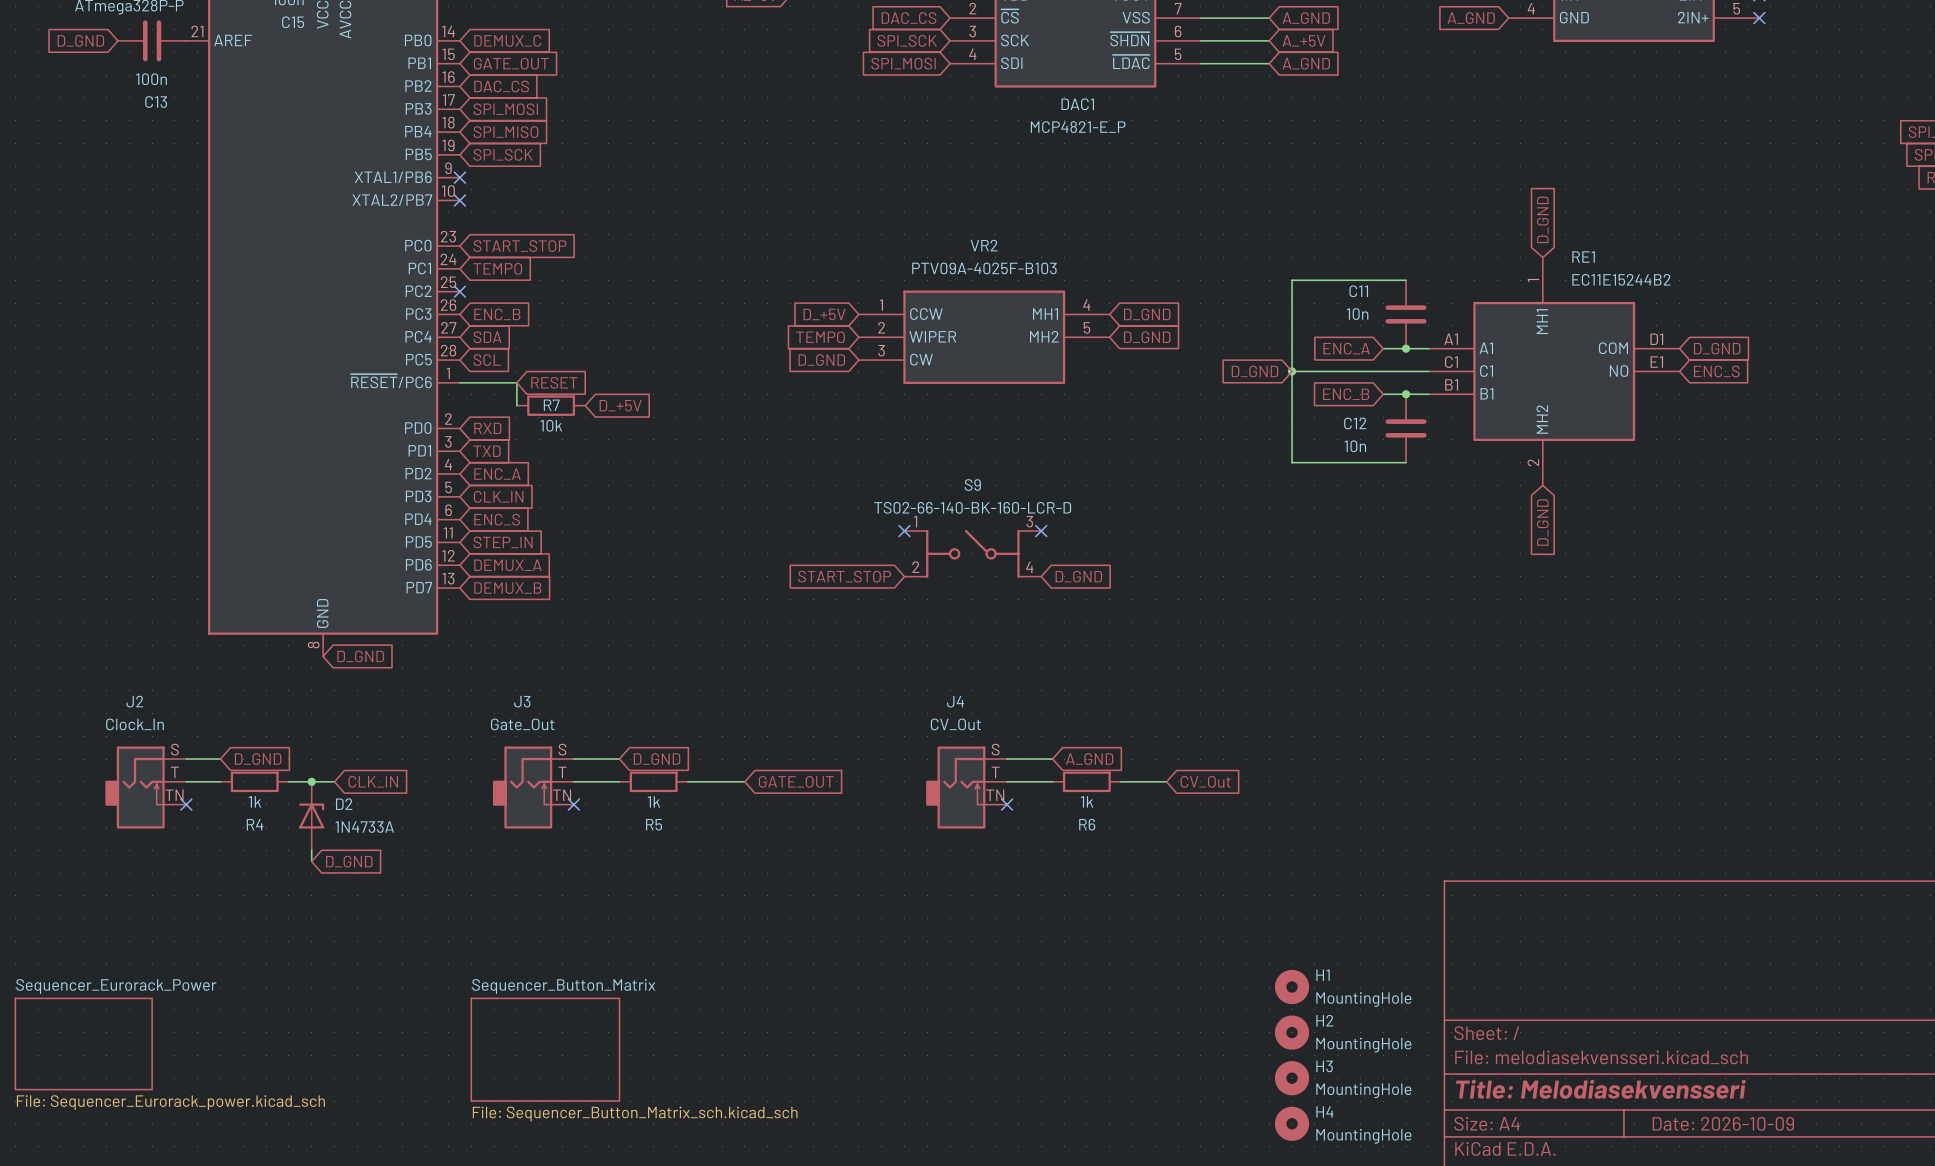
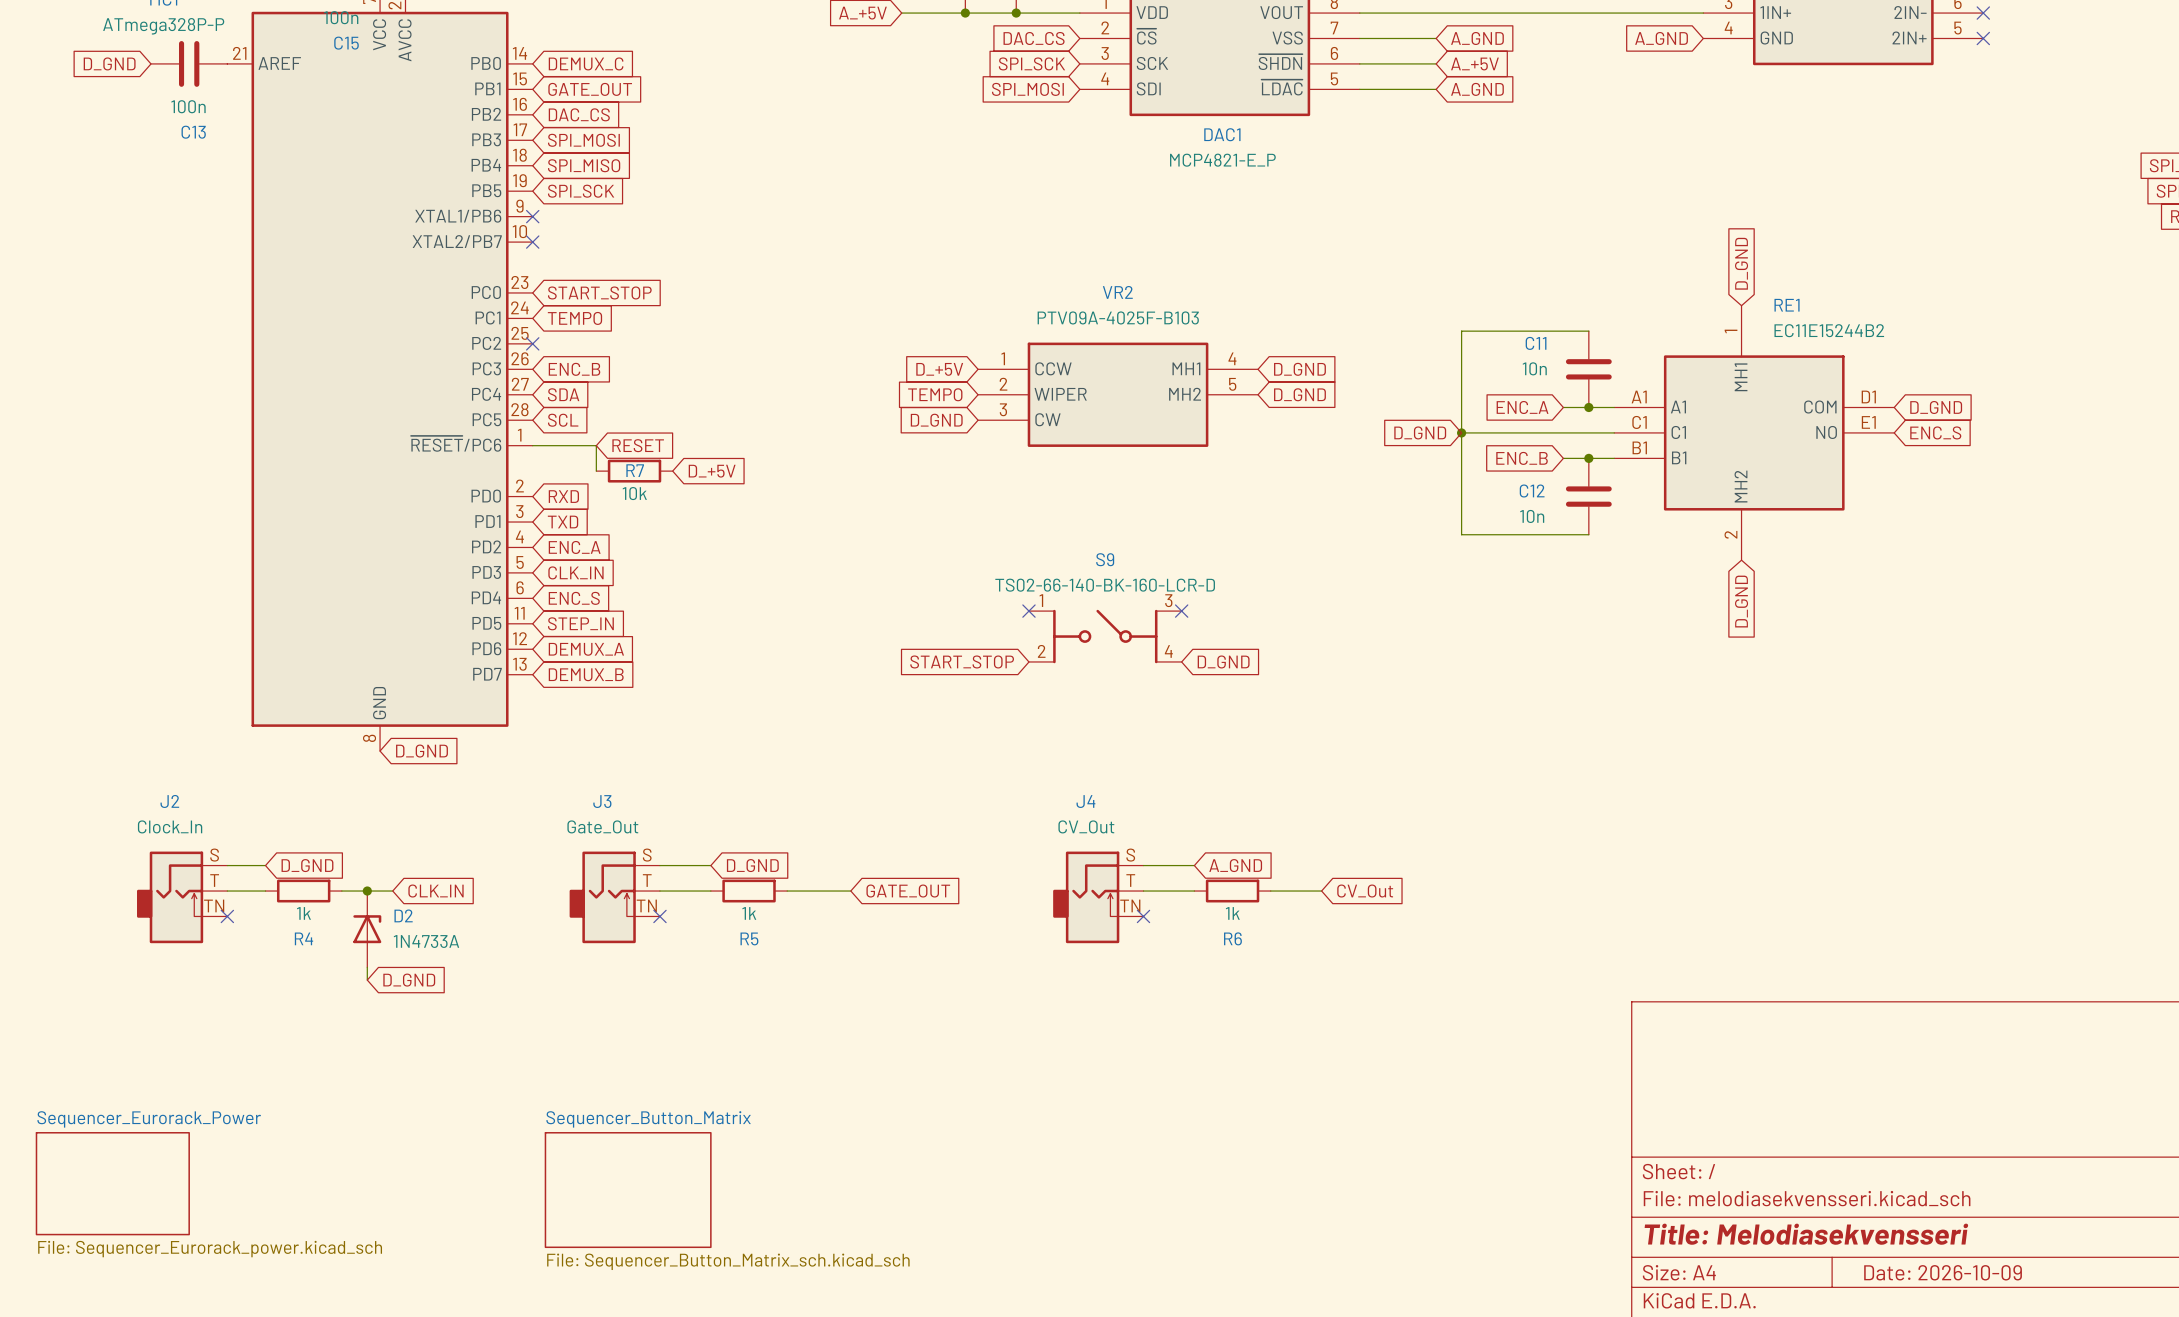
H1: MountingHole (1292, 987) -> none
H2: MountingHole (1292, 1032) -> none
H3: MountingHole (1292, 1078) -> none
H4: MountingHole (1292, 1123) -> none

